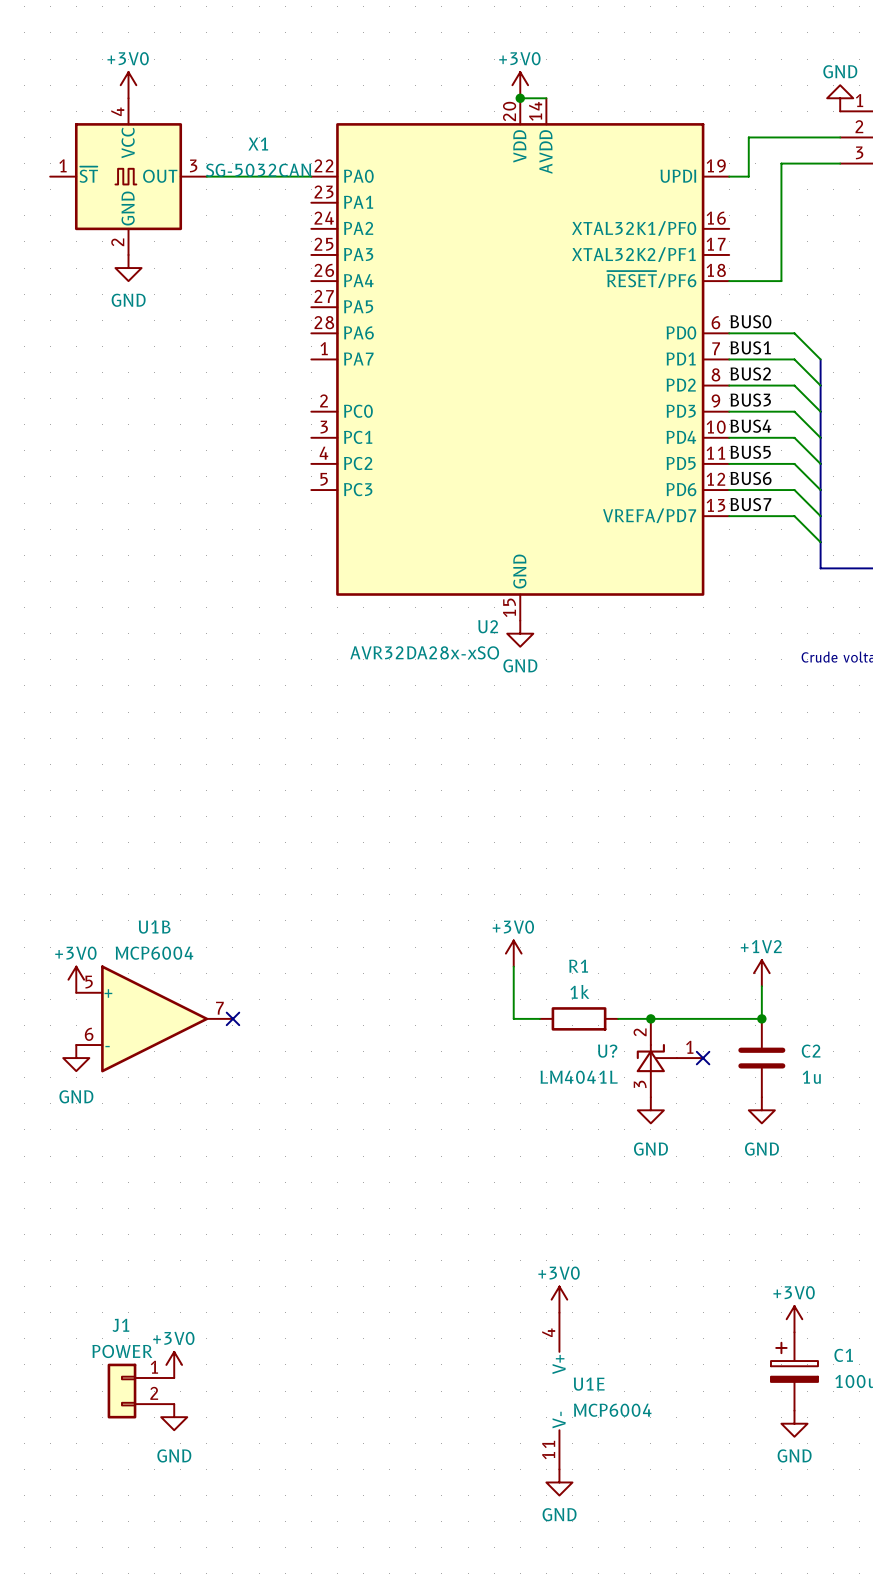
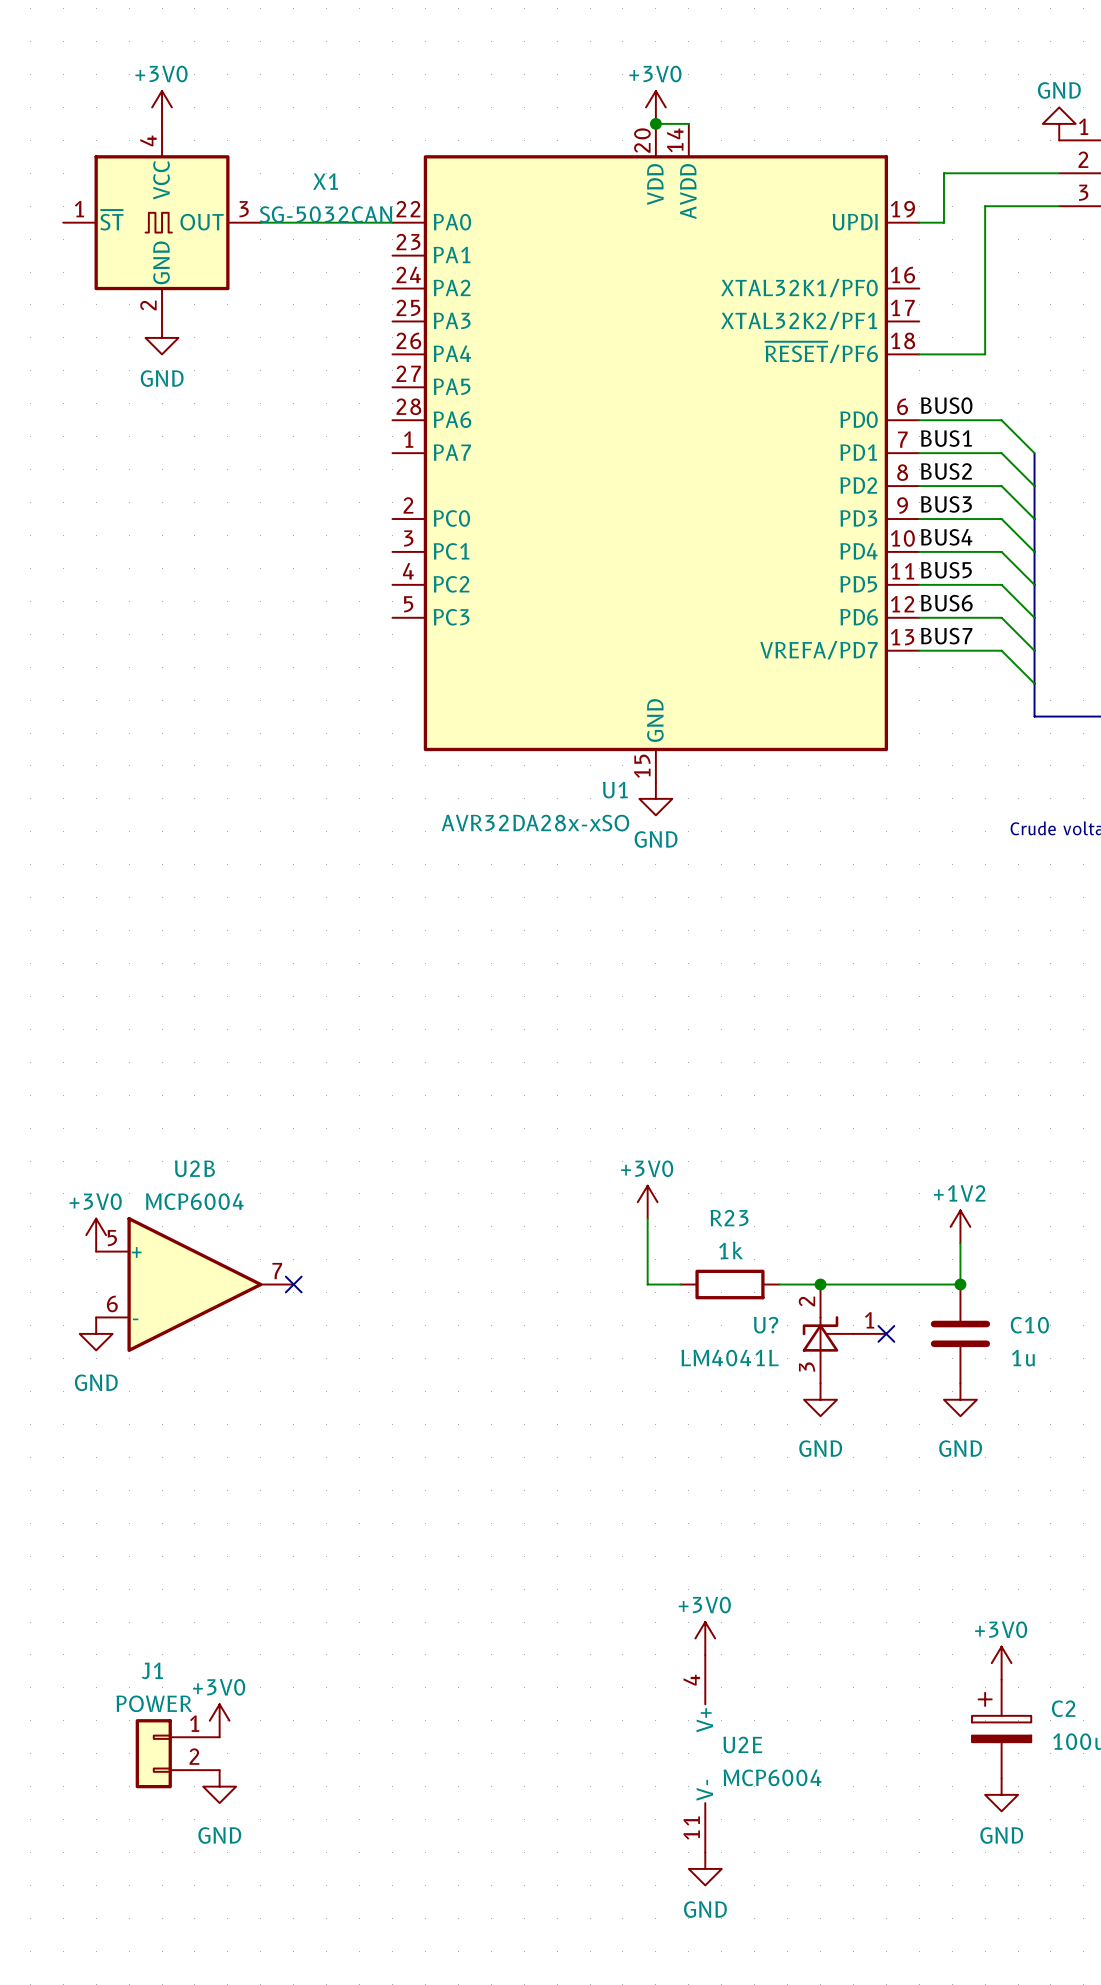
U2 name: U2 (488, 626) -> U1 (615, 790)
U1B name: U1B (154, 927) -> U2B (194, 1168)
R1 name: R1 (578, 966) -> R23 (729, 1218)
C2 name: C2 (811, 1051) -> C10 (1029, 1325)
C1 name: C1 (843, 1355) -> C2 (1063, 1708)
U1E name: U1E (589, 1384) -> U2E (742, 1744)

